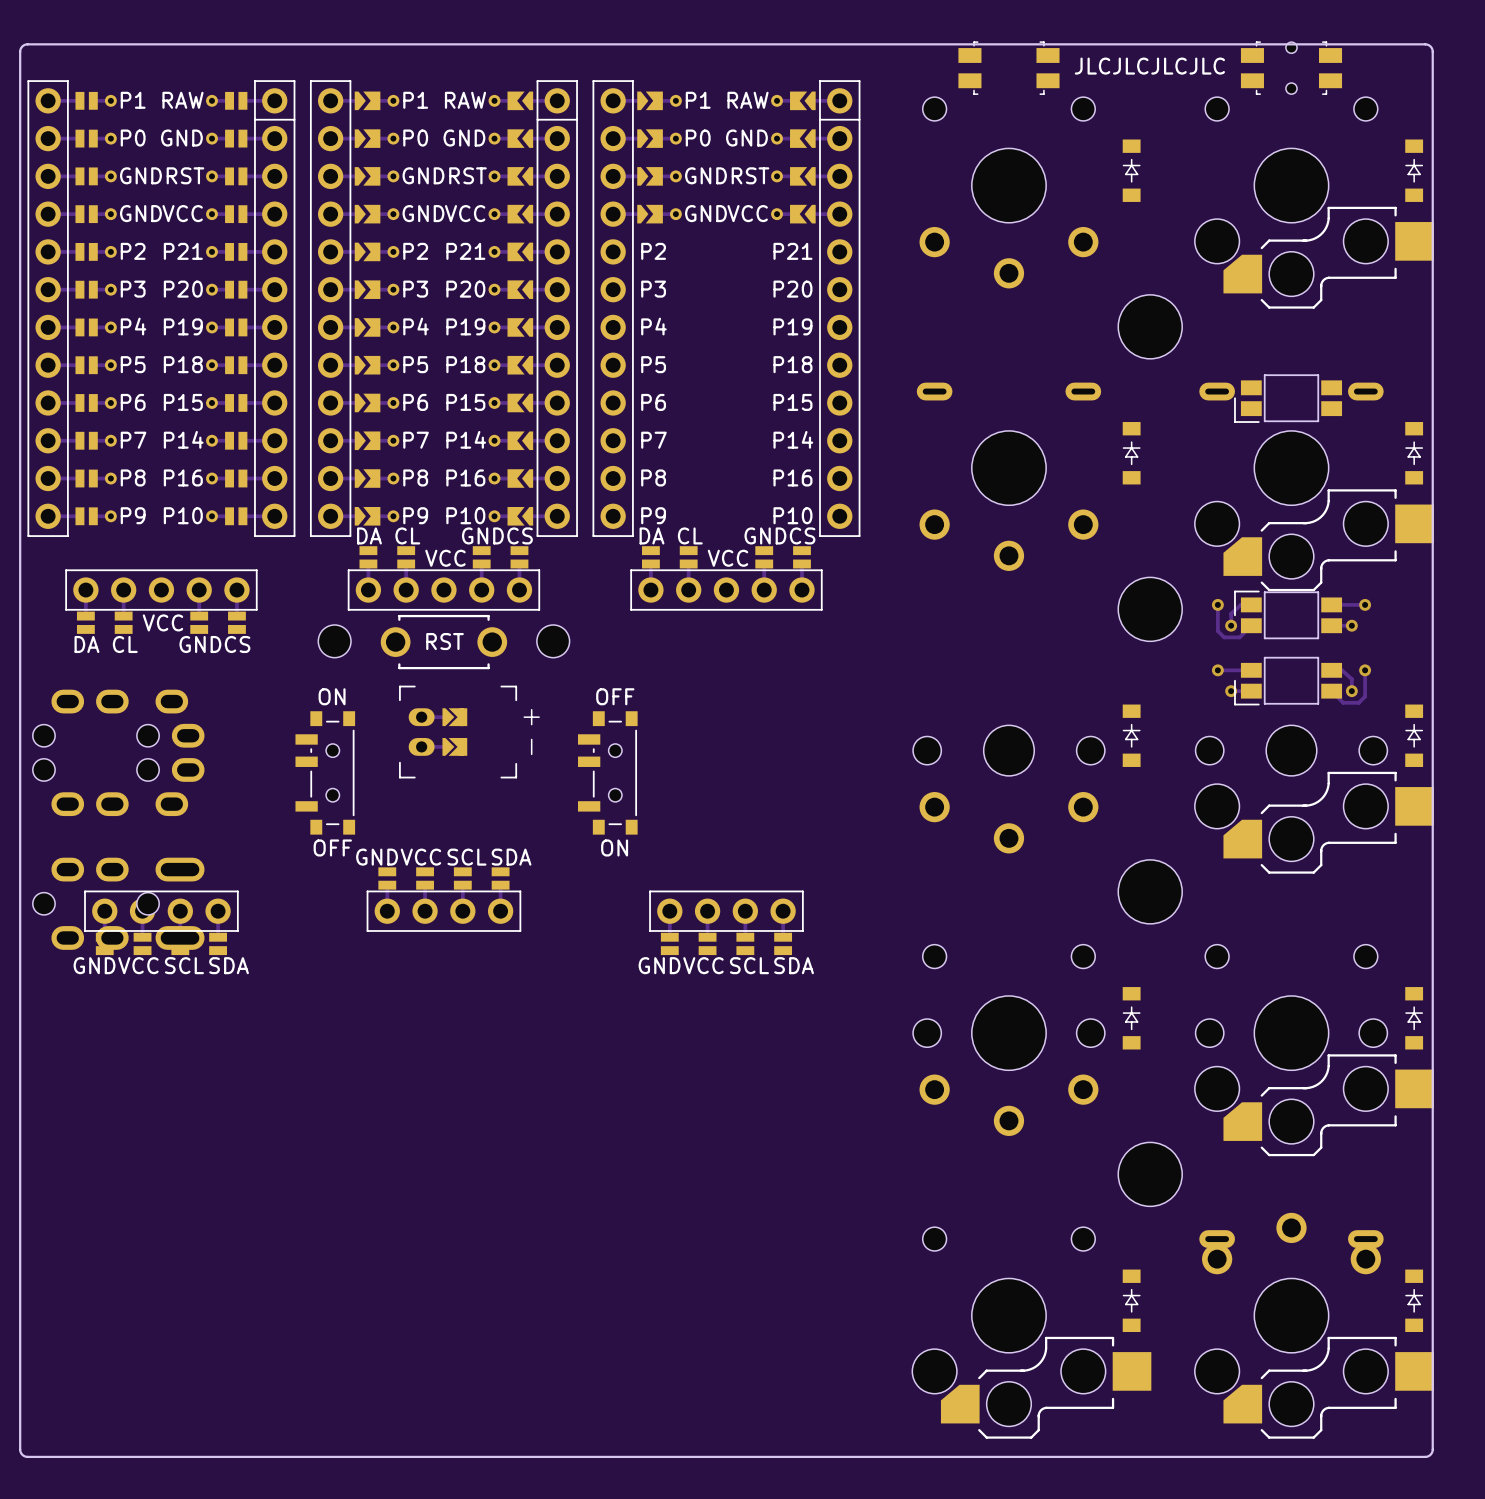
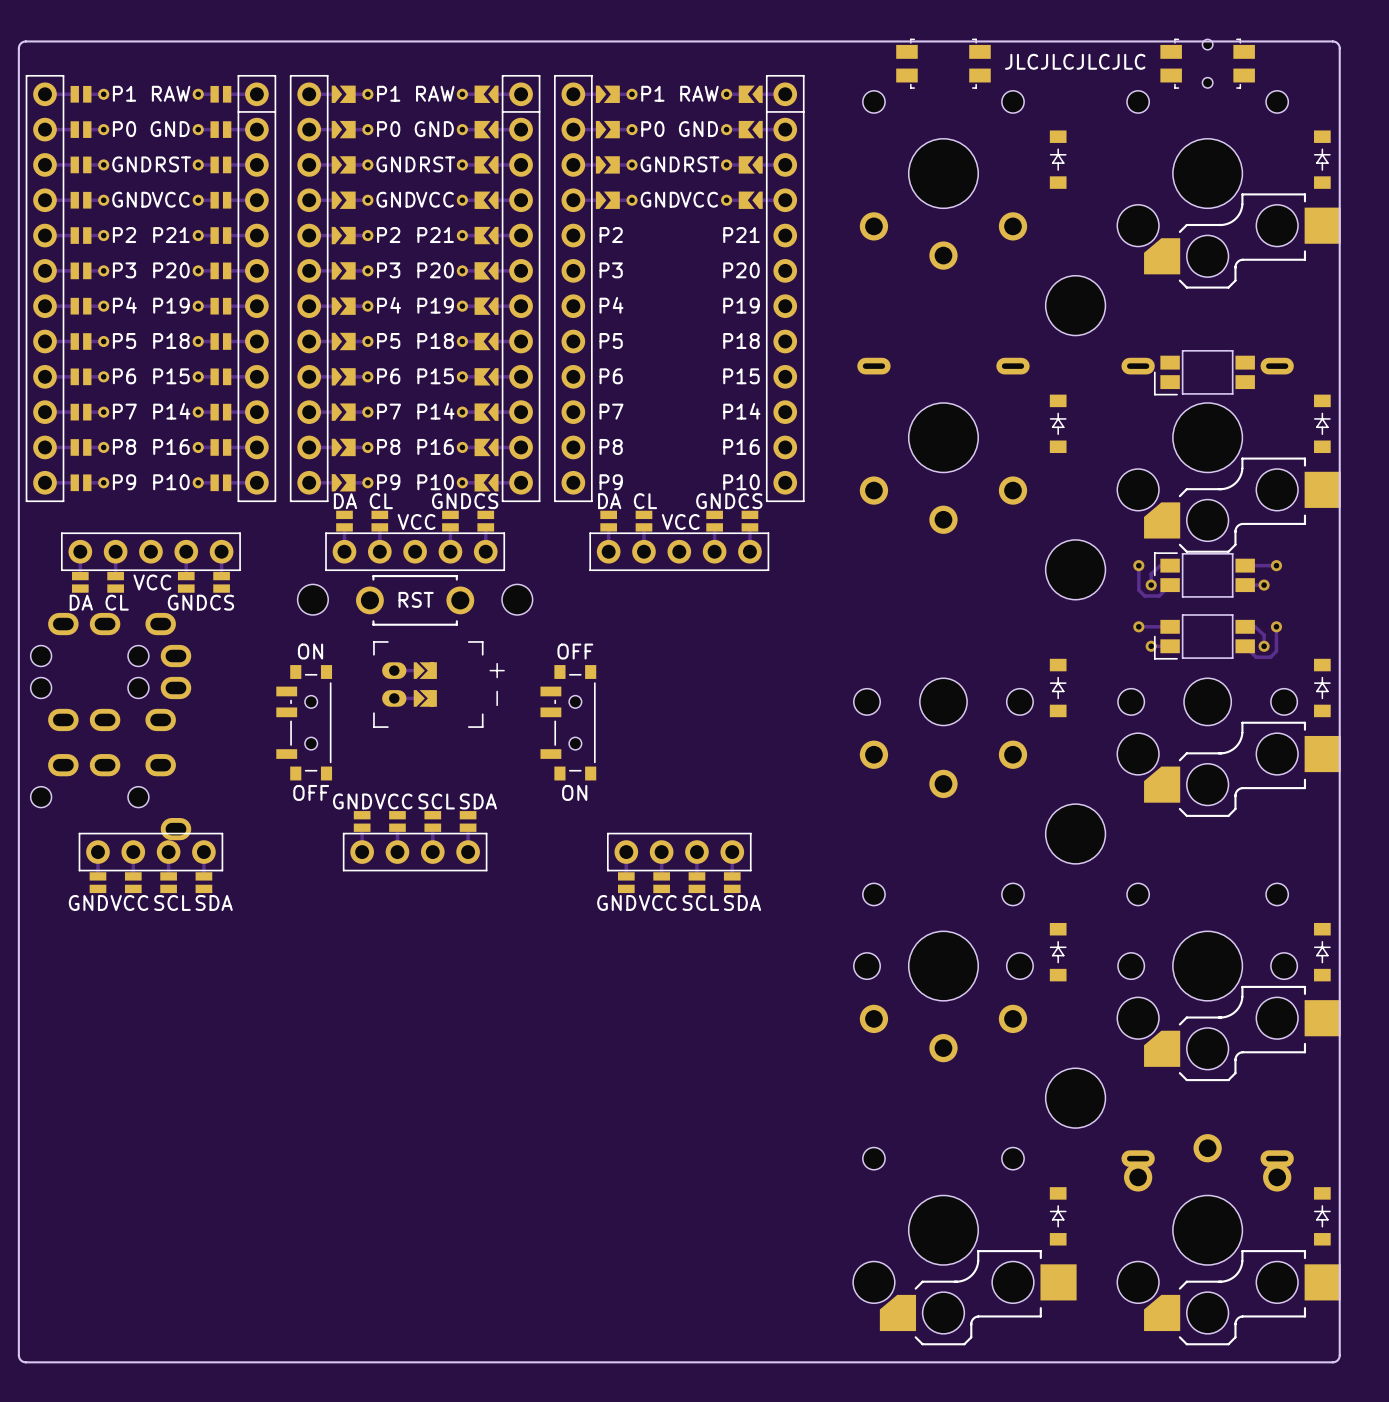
part position: (118, 752) -> (110, 672)
part: none -> (110, 797)
part: (118, 903) -> none

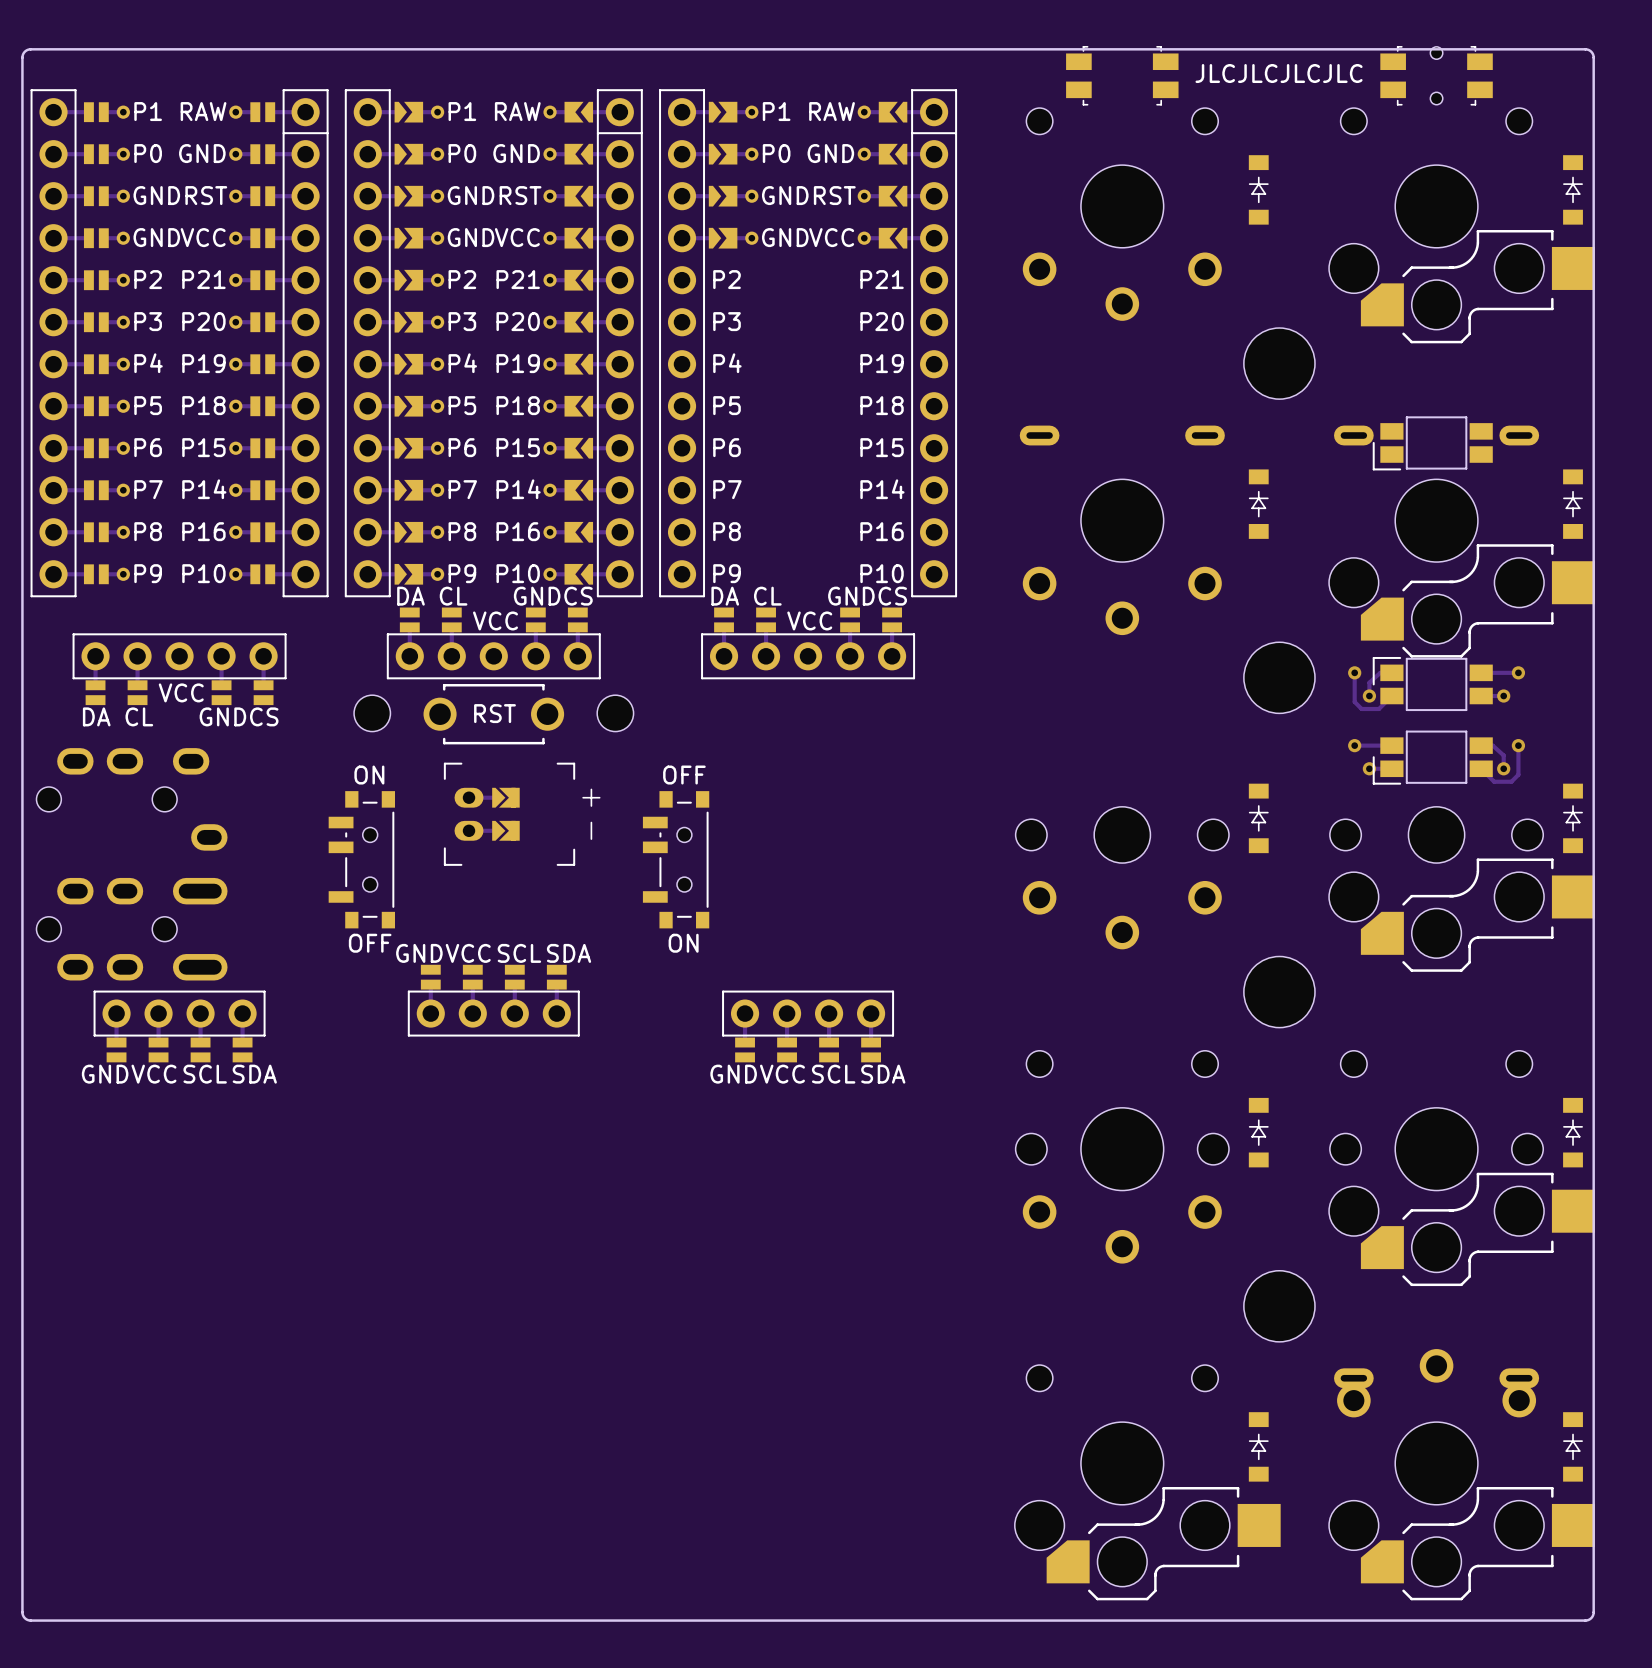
part footprint: [30, 612, 192, 732] -> [36, 748, 228, 851]
part: none -> (132, 929)
part: (110, 797) -> none

